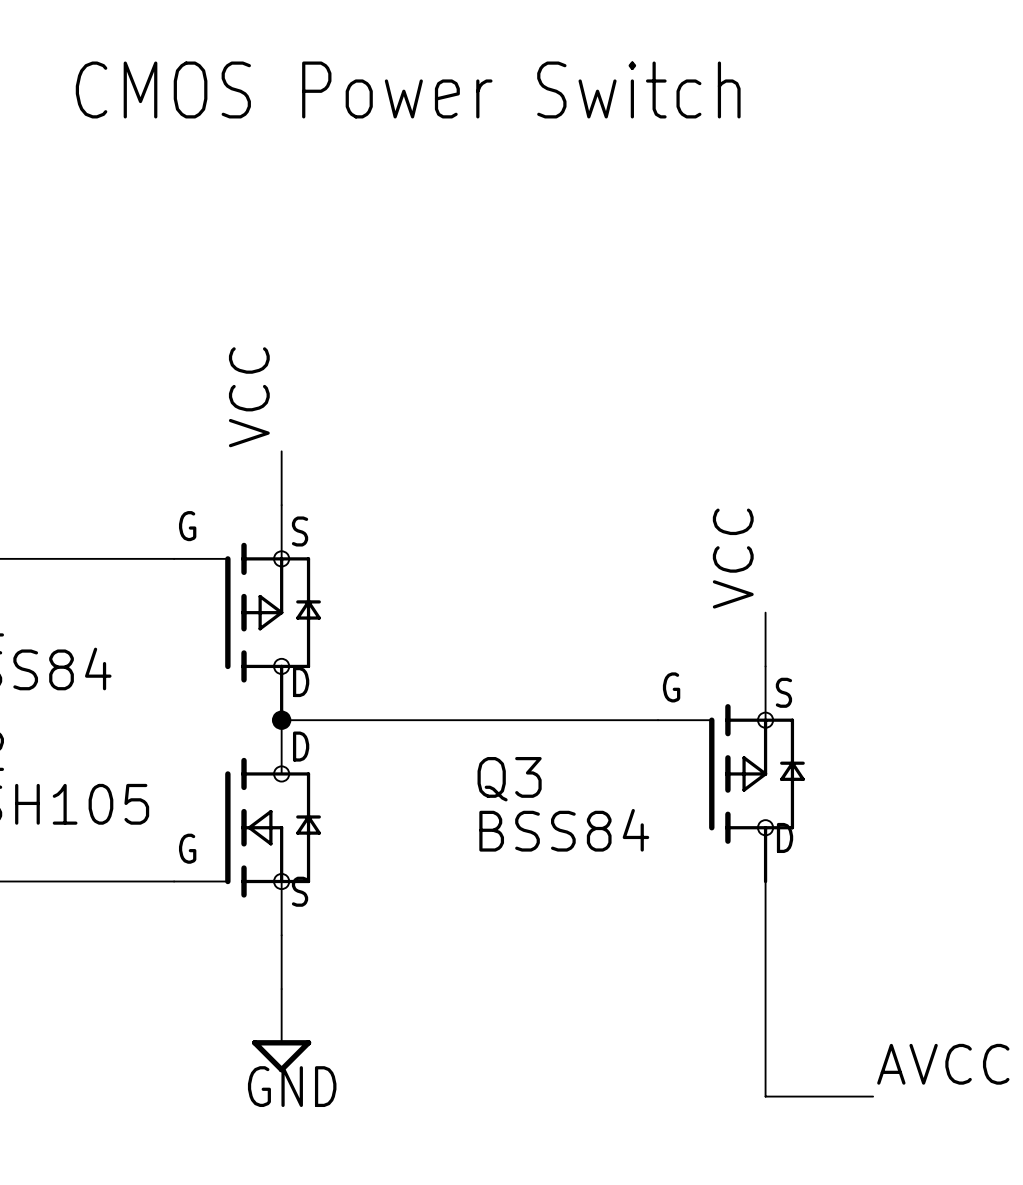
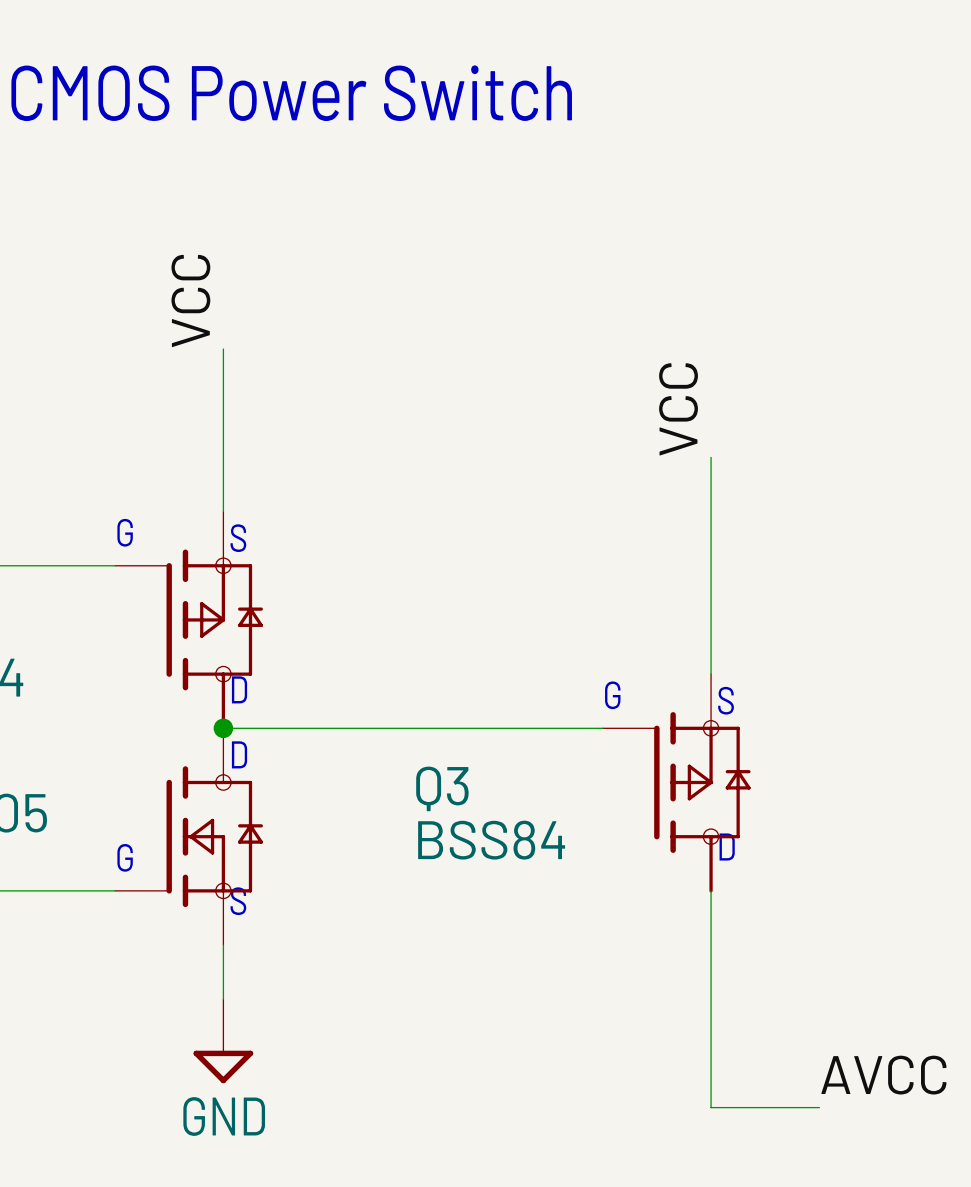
wire: none -> (223, 349) (223, 457)
label position: VCC (249, 397) -> VCC (190, 301)
wire: none -> (711, 457) (711, 619)
label position: VCC (733, 558) -> VCC (678, 409)
power symbol text position: GND (292, 1086) -> GND (224, 1116)

